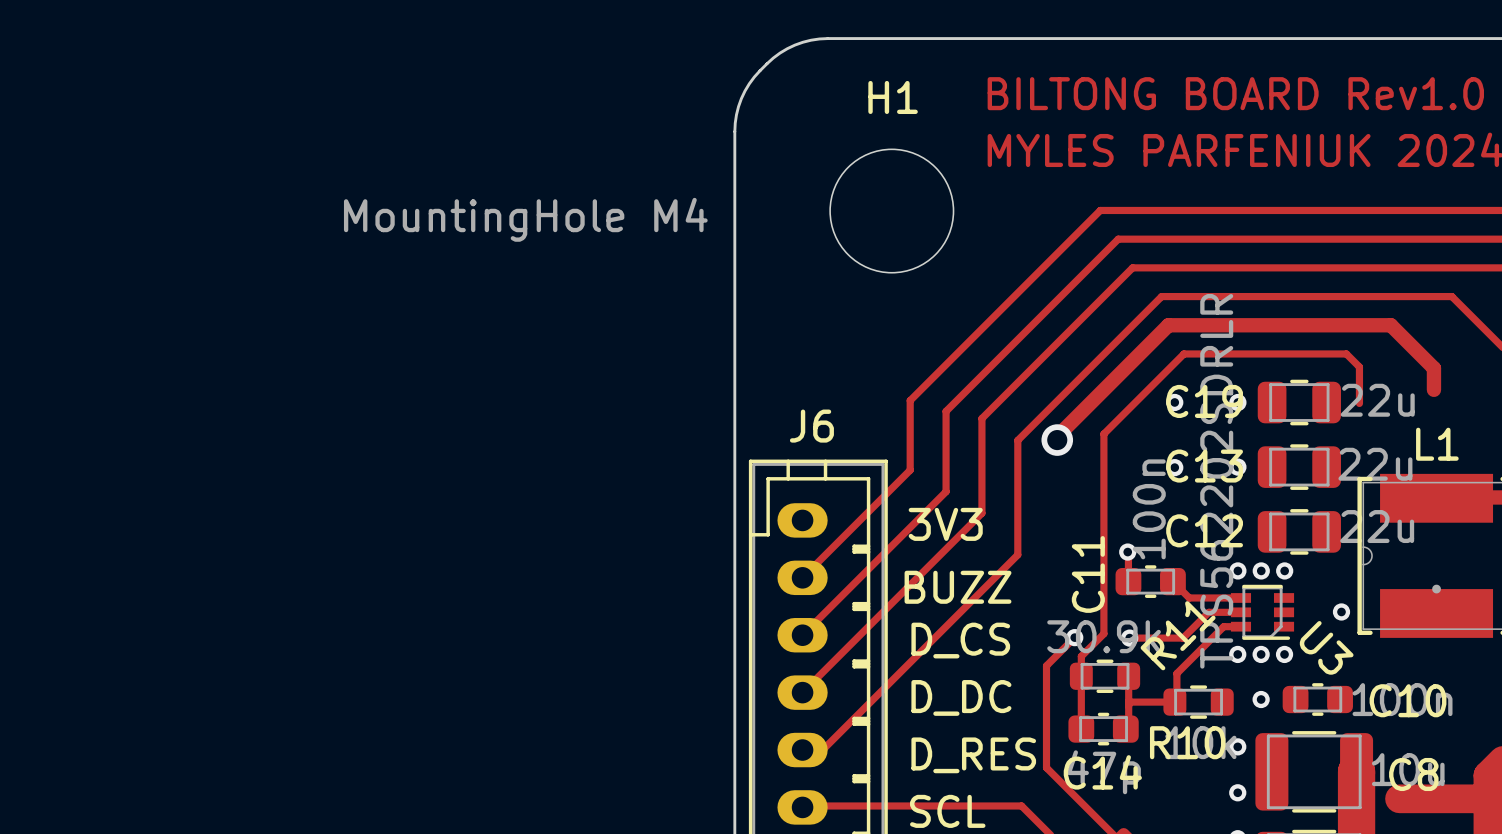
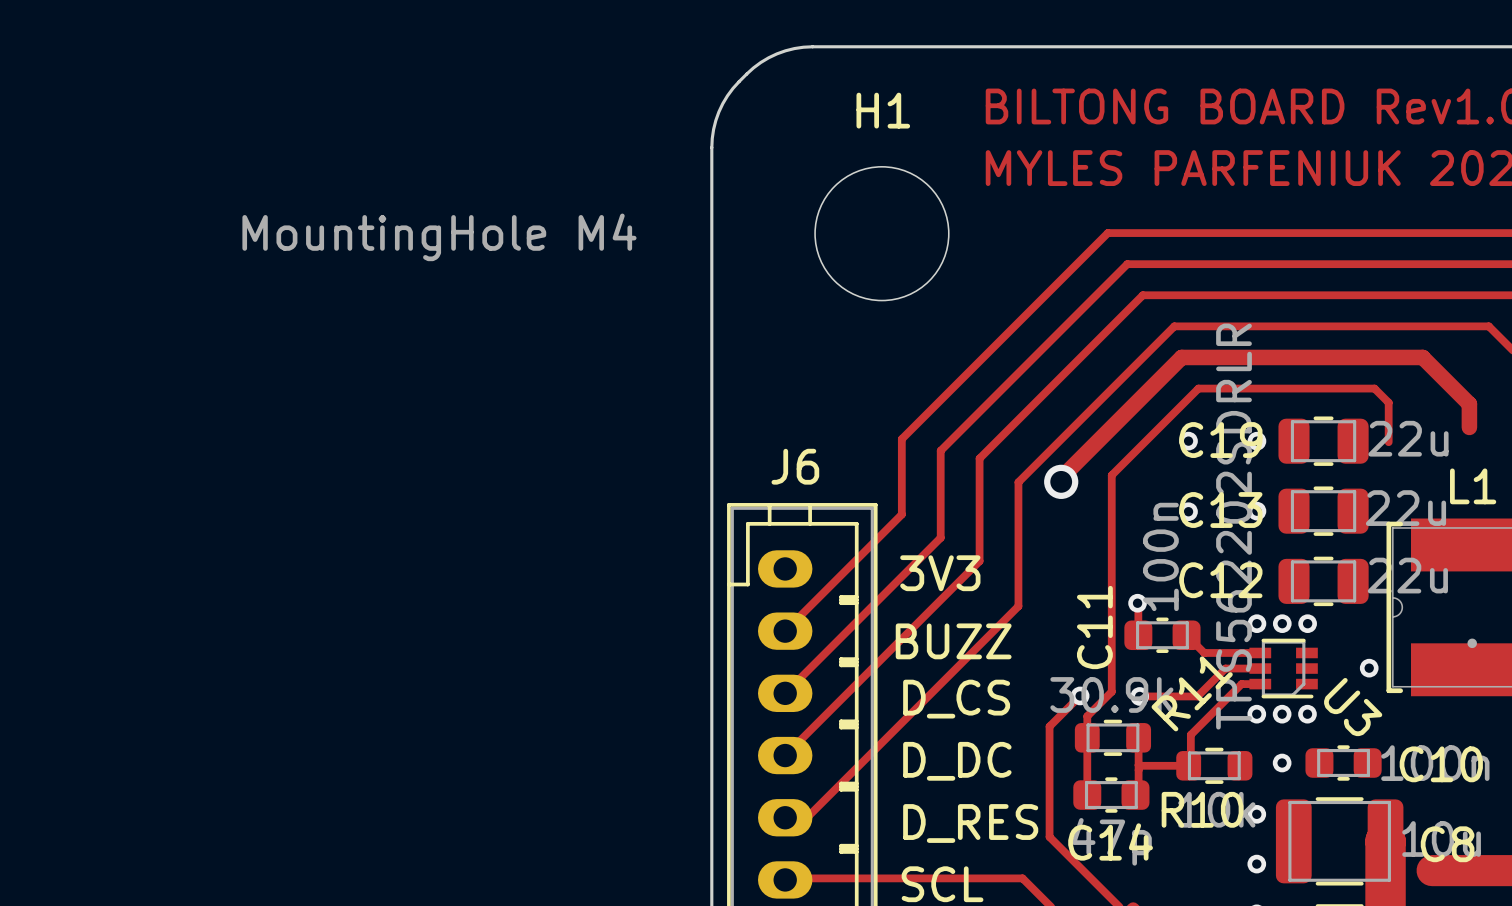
H1 value position: MountingHole M4 (525, 219) -> MountingHole M4 (439, 237)

